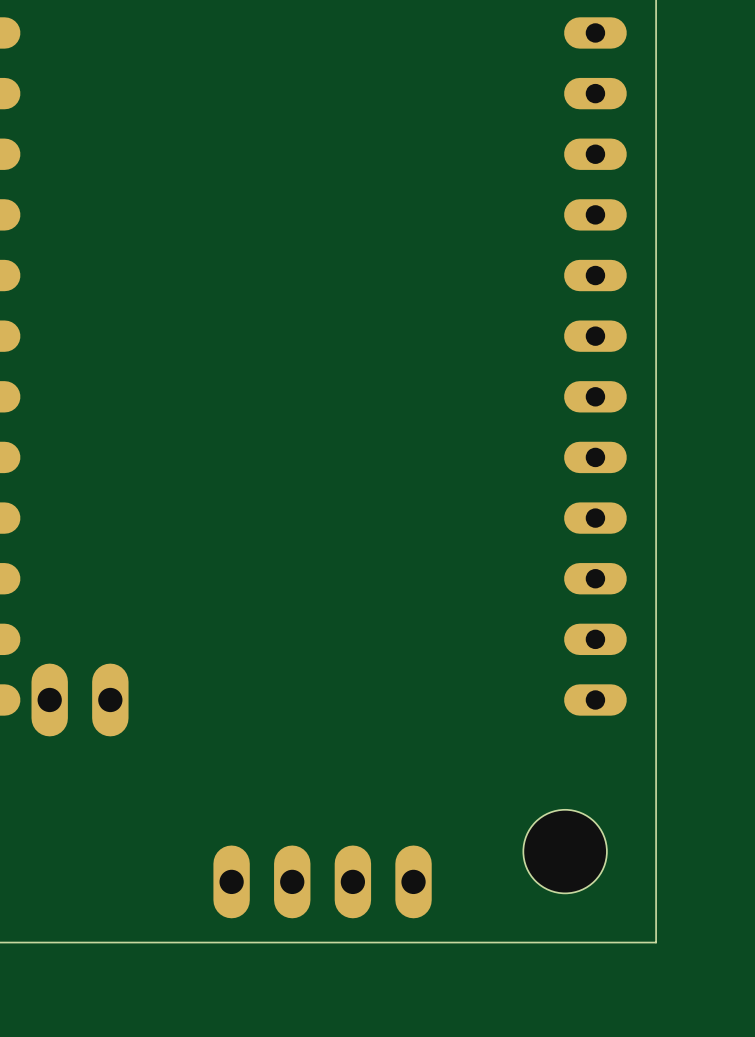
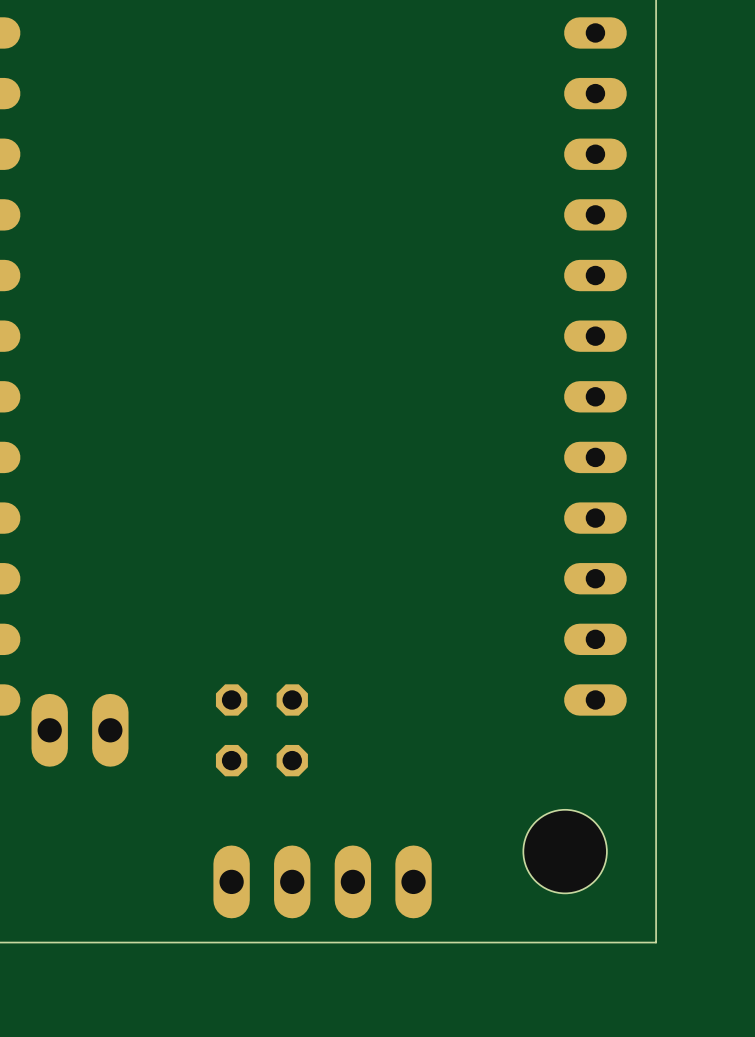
part position: (80, 699) -> (80, 730)
part: none -> (231, 730)
part: none -> (292, 730)

